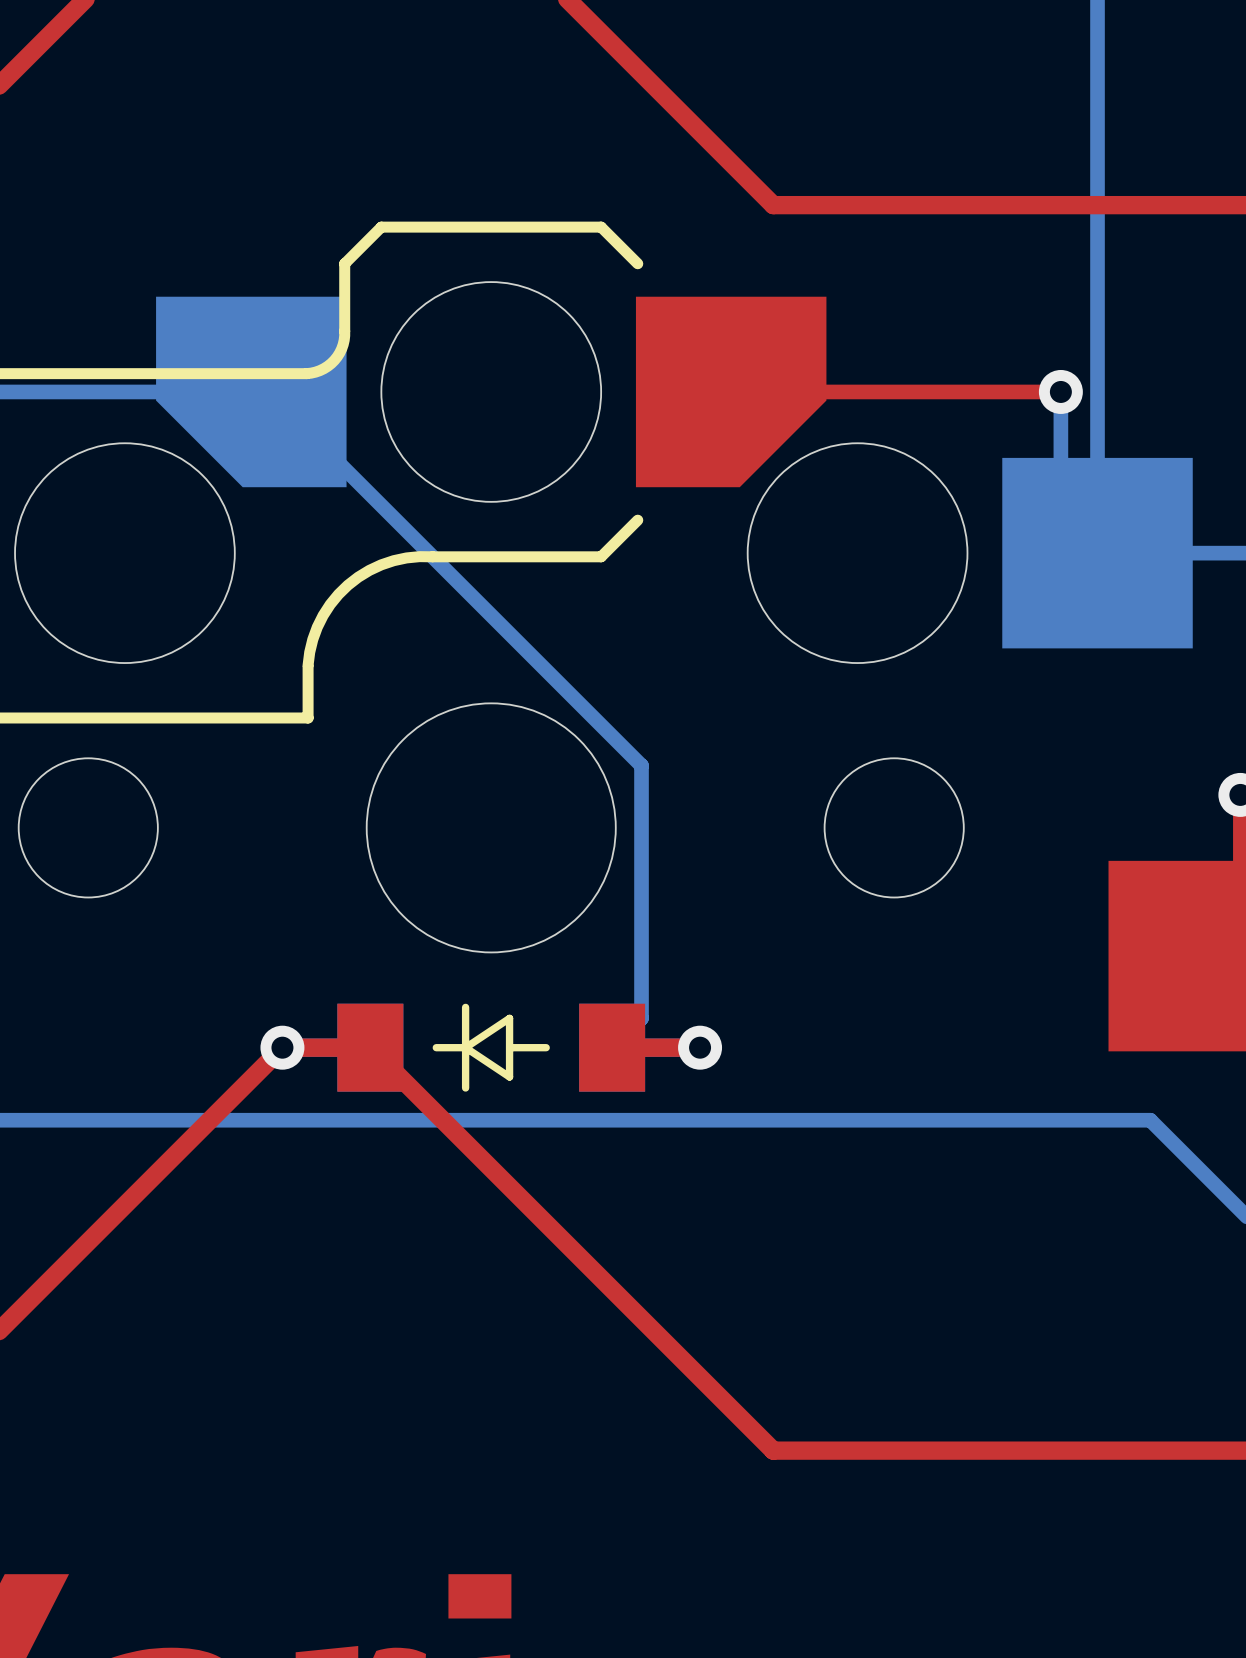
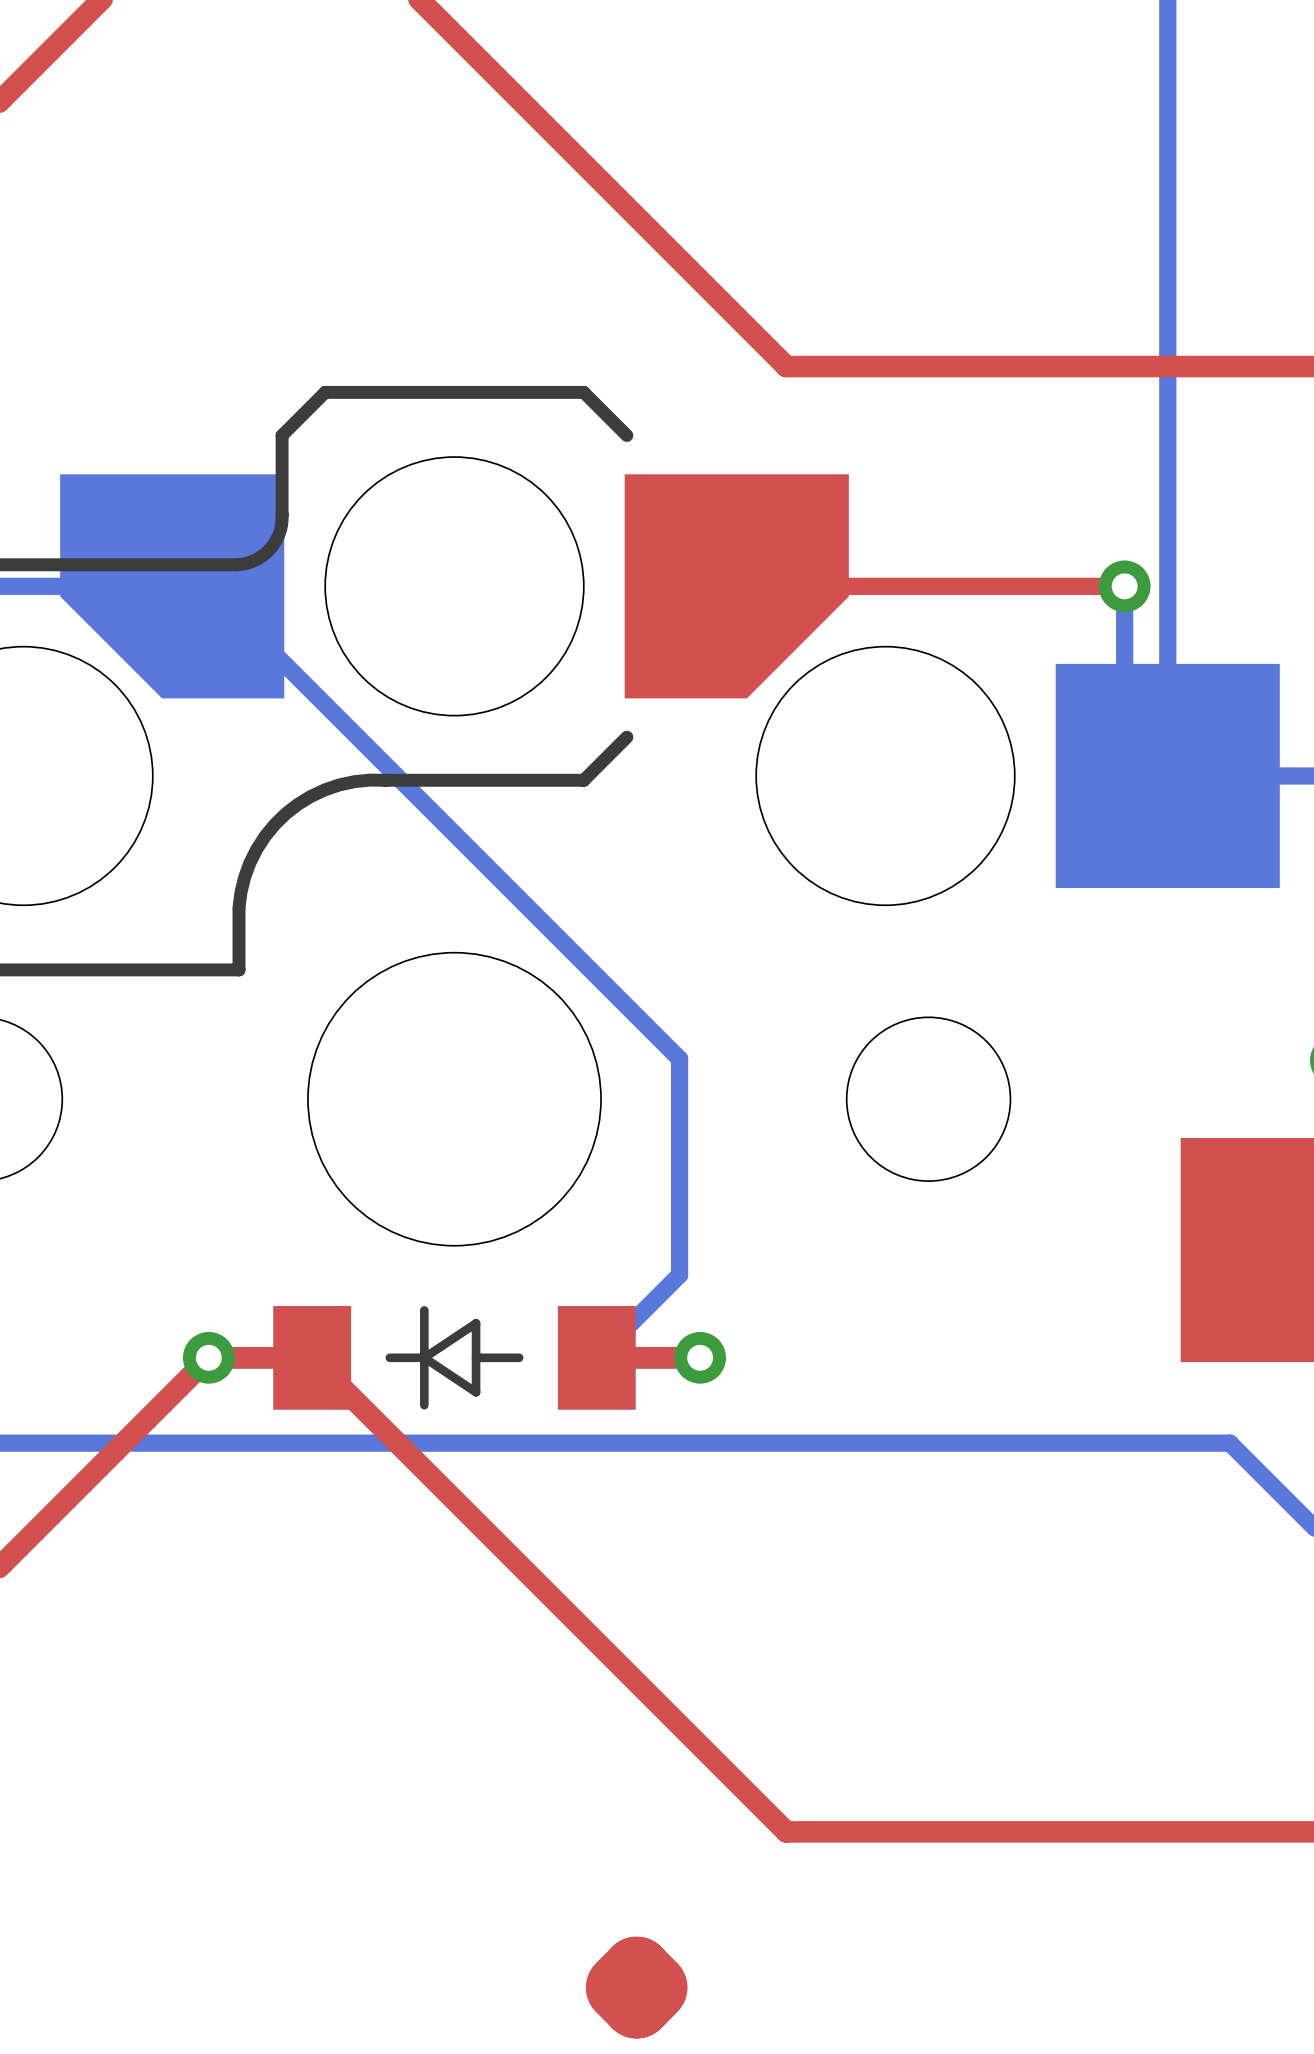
bottom track: (267, 391) (641, 765) (641, 1018) -> (191, 586) (206, 586) (679, 1058) (679, 1274) (631, 1323)

